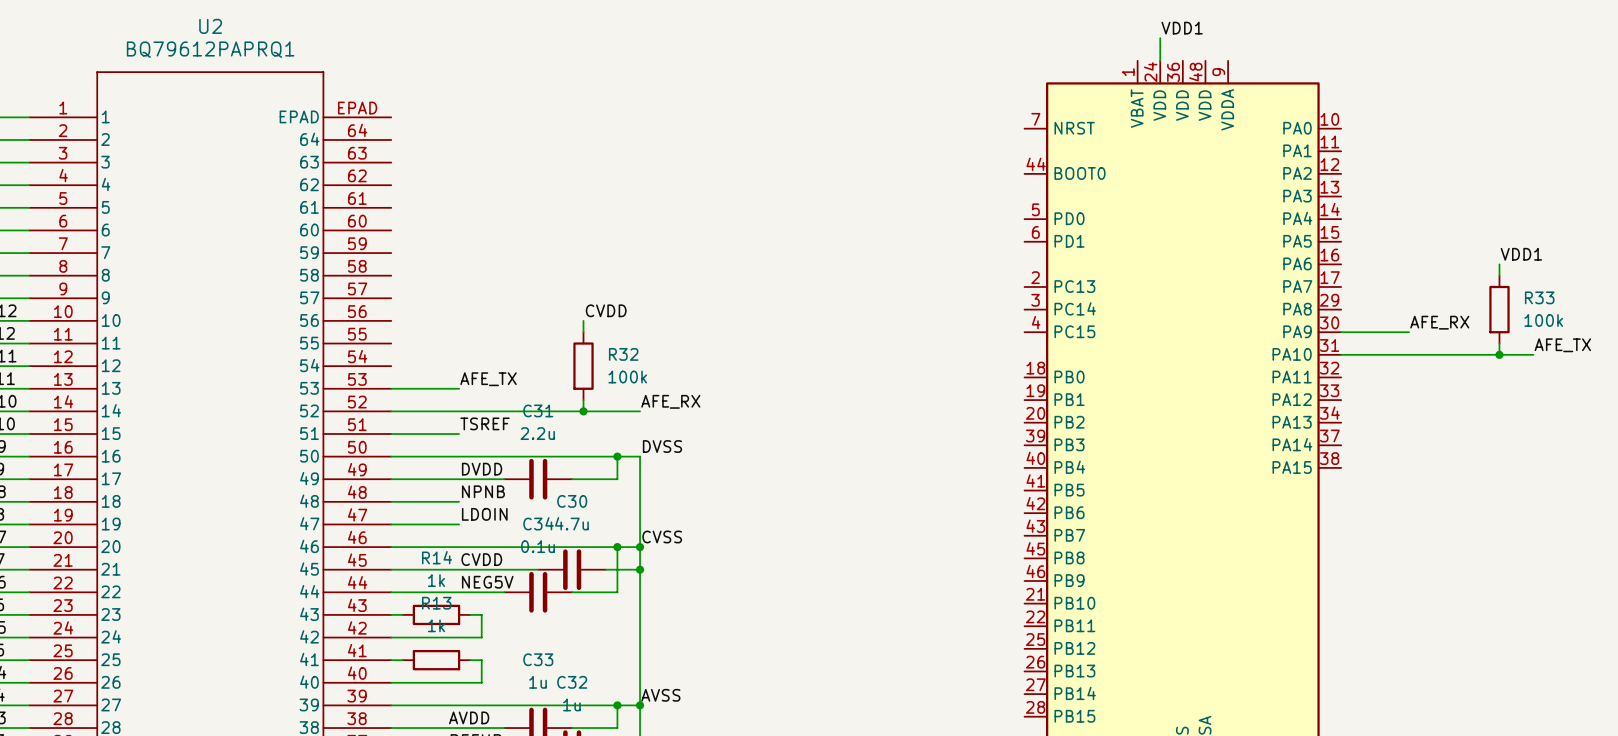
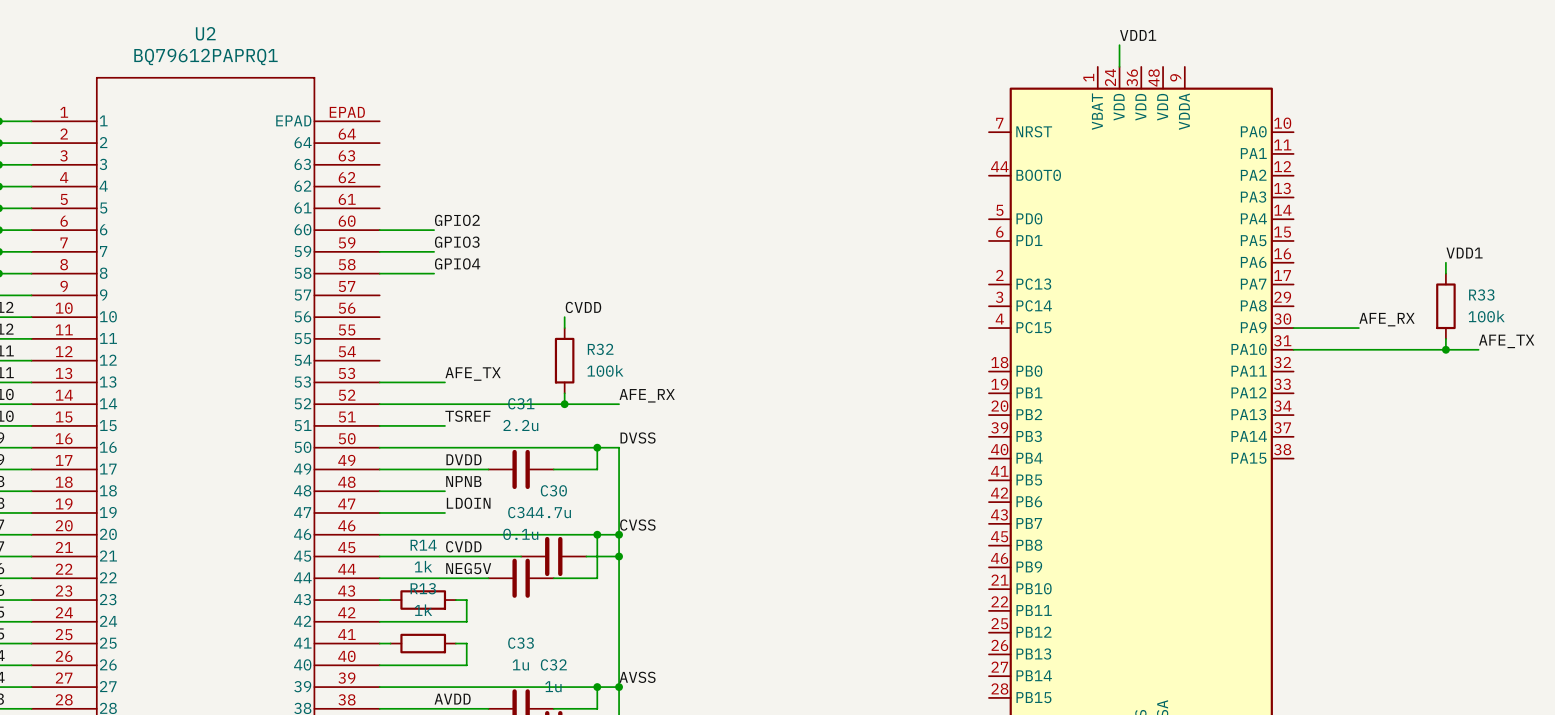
label: none -> GPIO2 (457, 220)
wire: none -> (379, 230) (434, 230)
label: none -> GPIO3 (457, 242)
wire: none -> (379, 251) (434, 251)
label: none -> GPIO4 (457, 263)
wire: none -> (379, 273) (434, 273)

